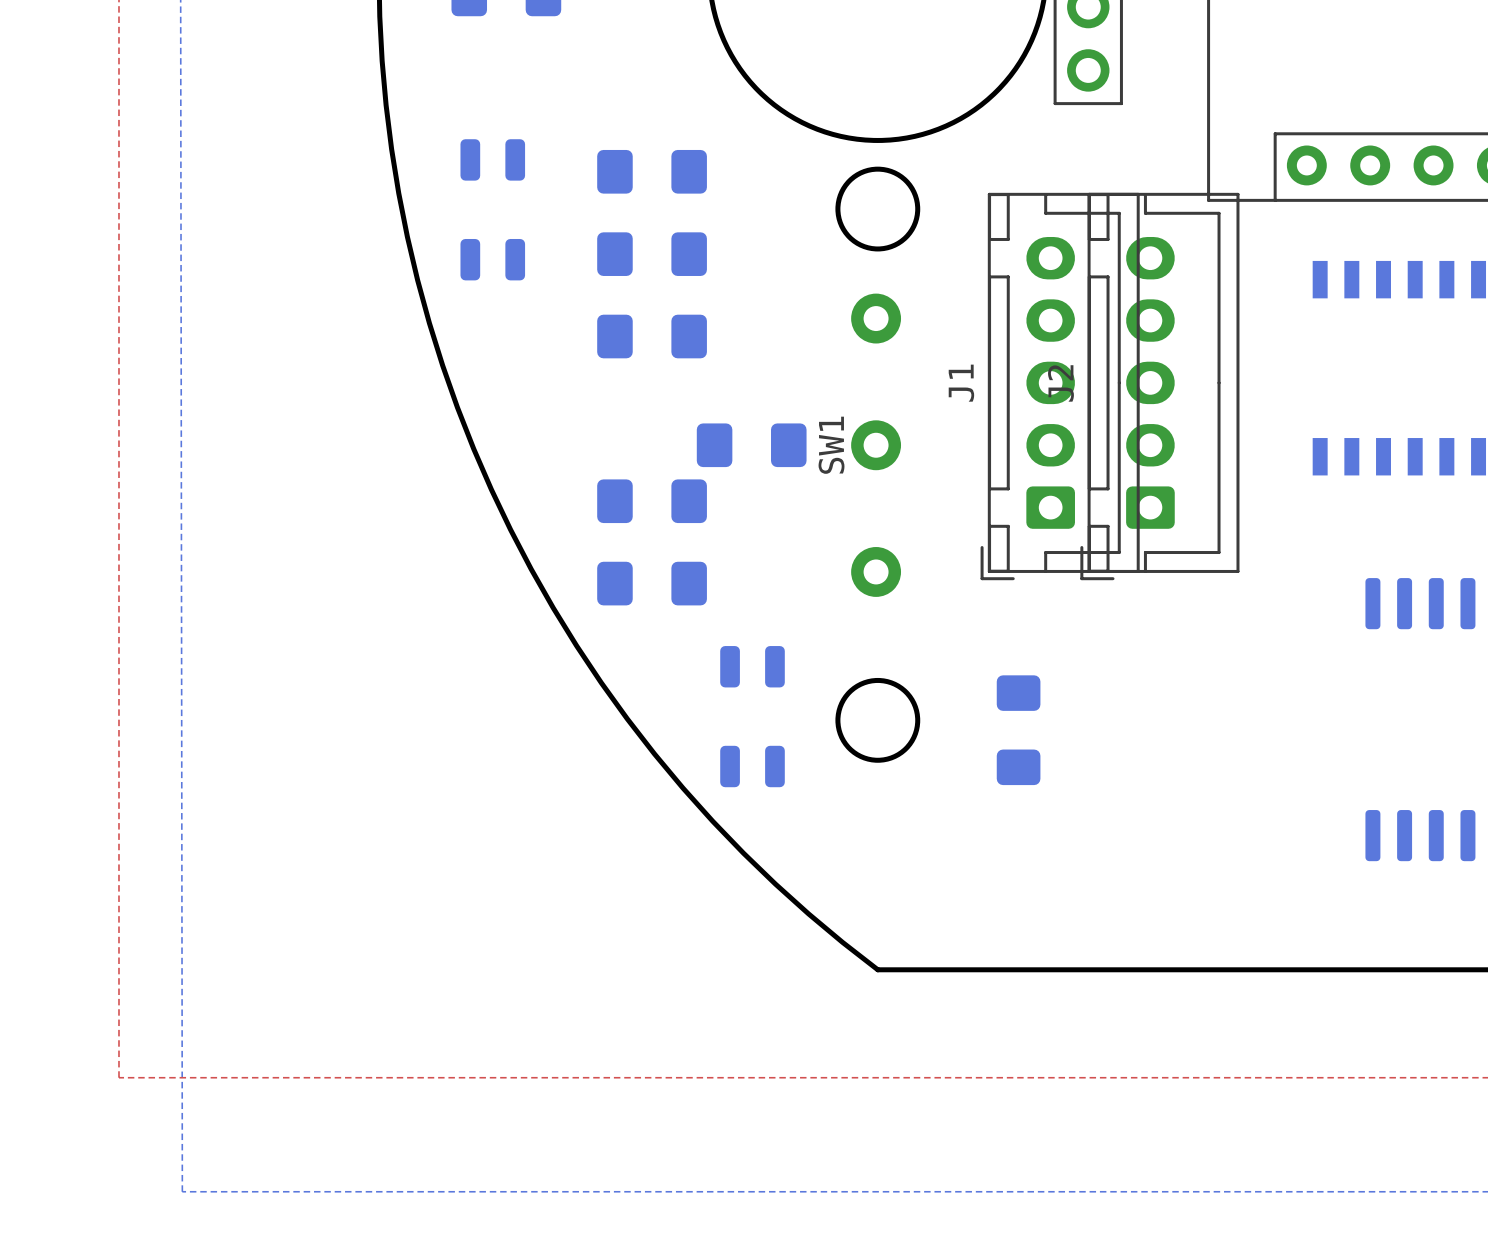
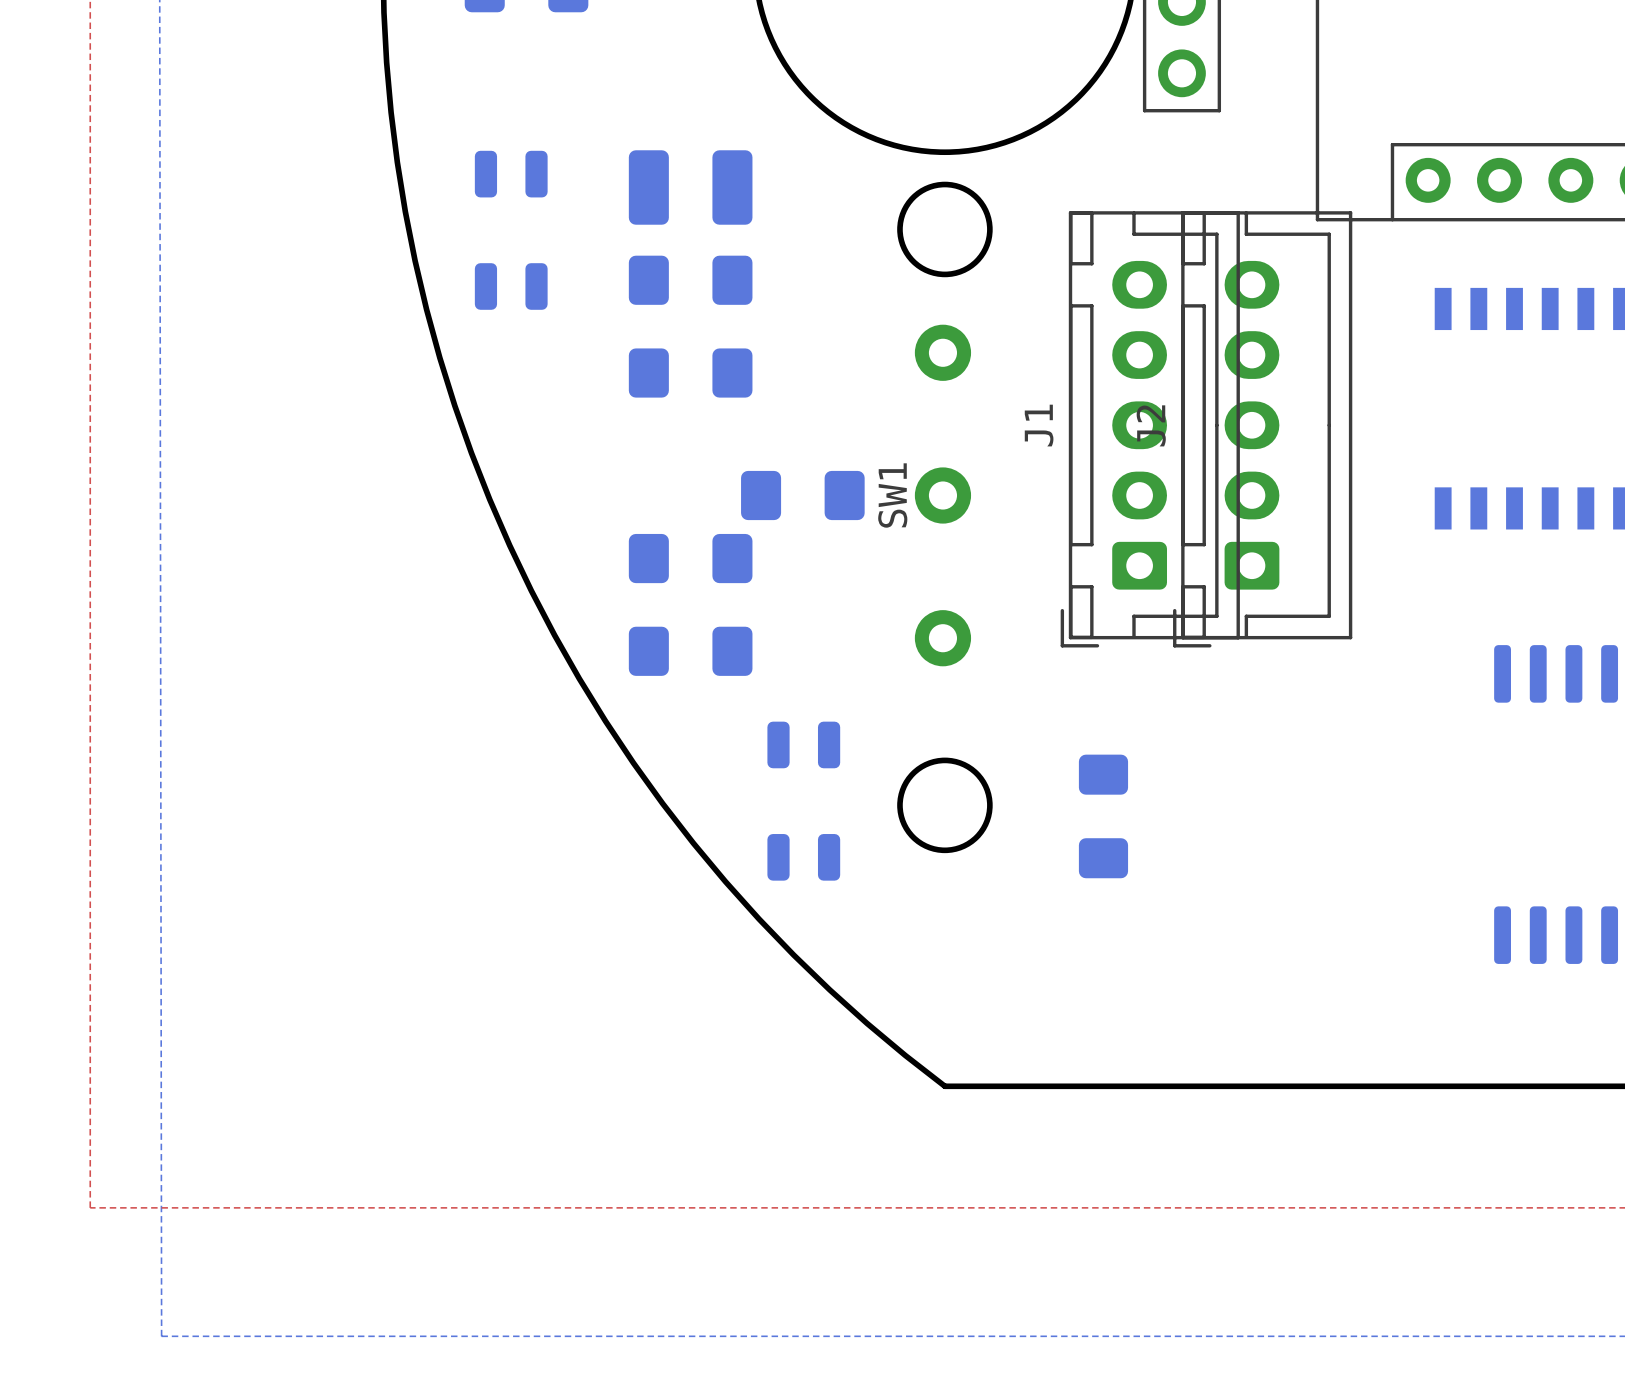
part footprint: [597, 149, 707, 194] -> [628, 150, 753, 225]

